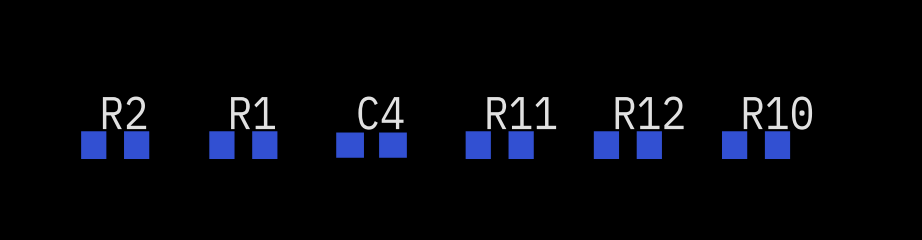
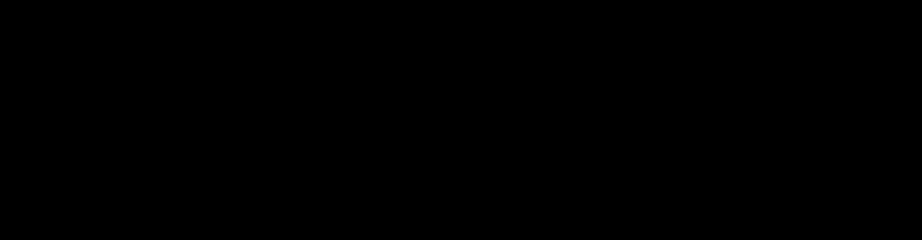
R2: (115, 145) -> none
R1: (243, 145) -> none
C4: (371, 145) -> none
R11: (499, 145) -> none
R12: (627, 145) -> none
R10: (756, 145) -> none

